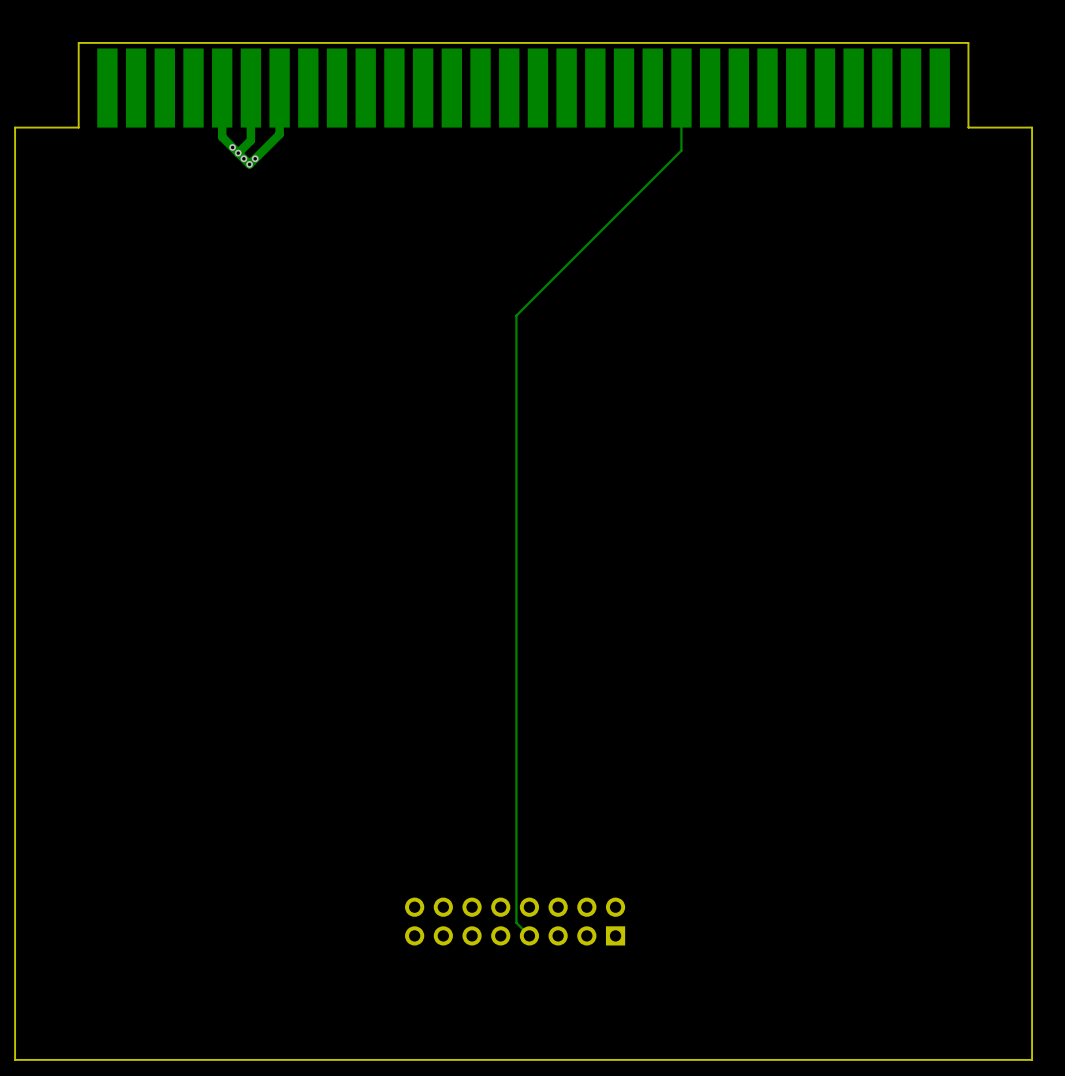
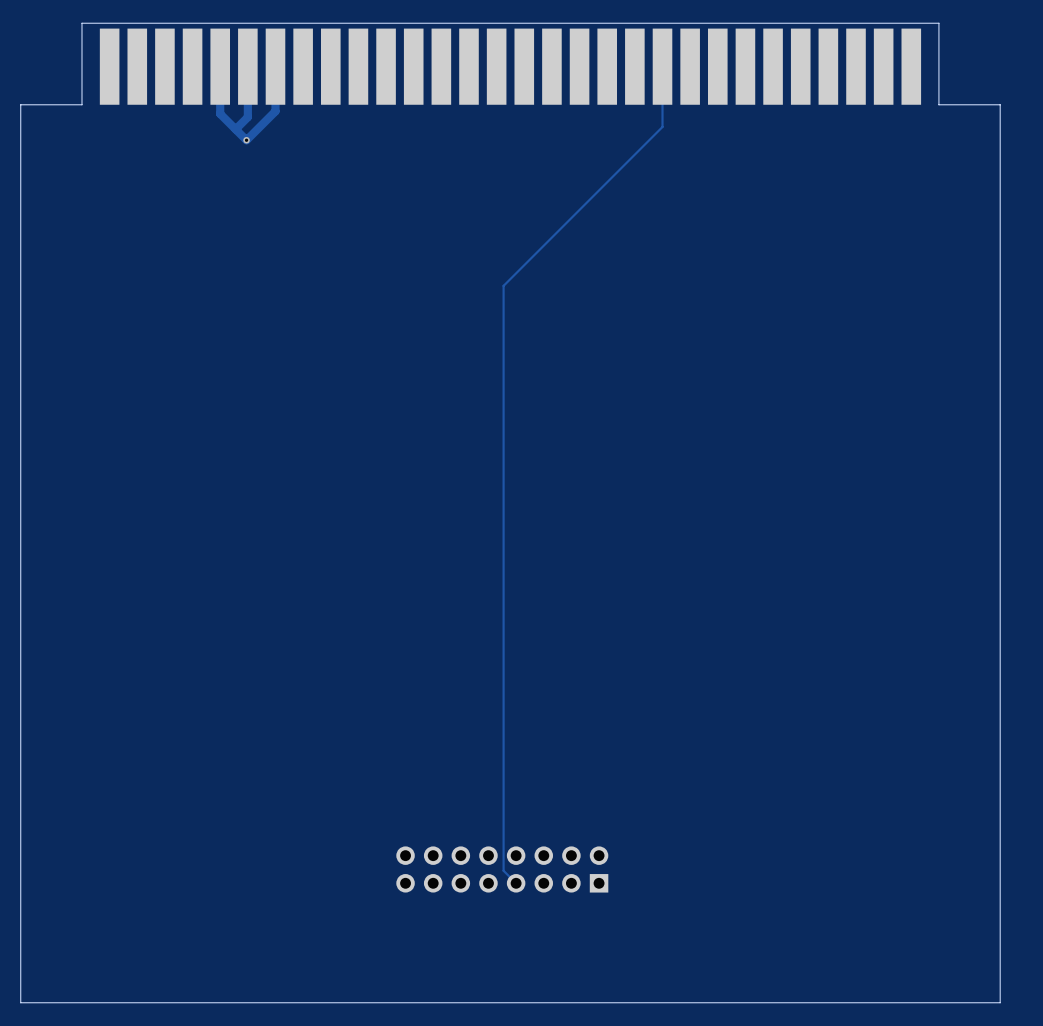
via: (232, 147) -> none
via: (238, 153) -> none
via: (243, 158) -> none
via: (255, 158) -> none

